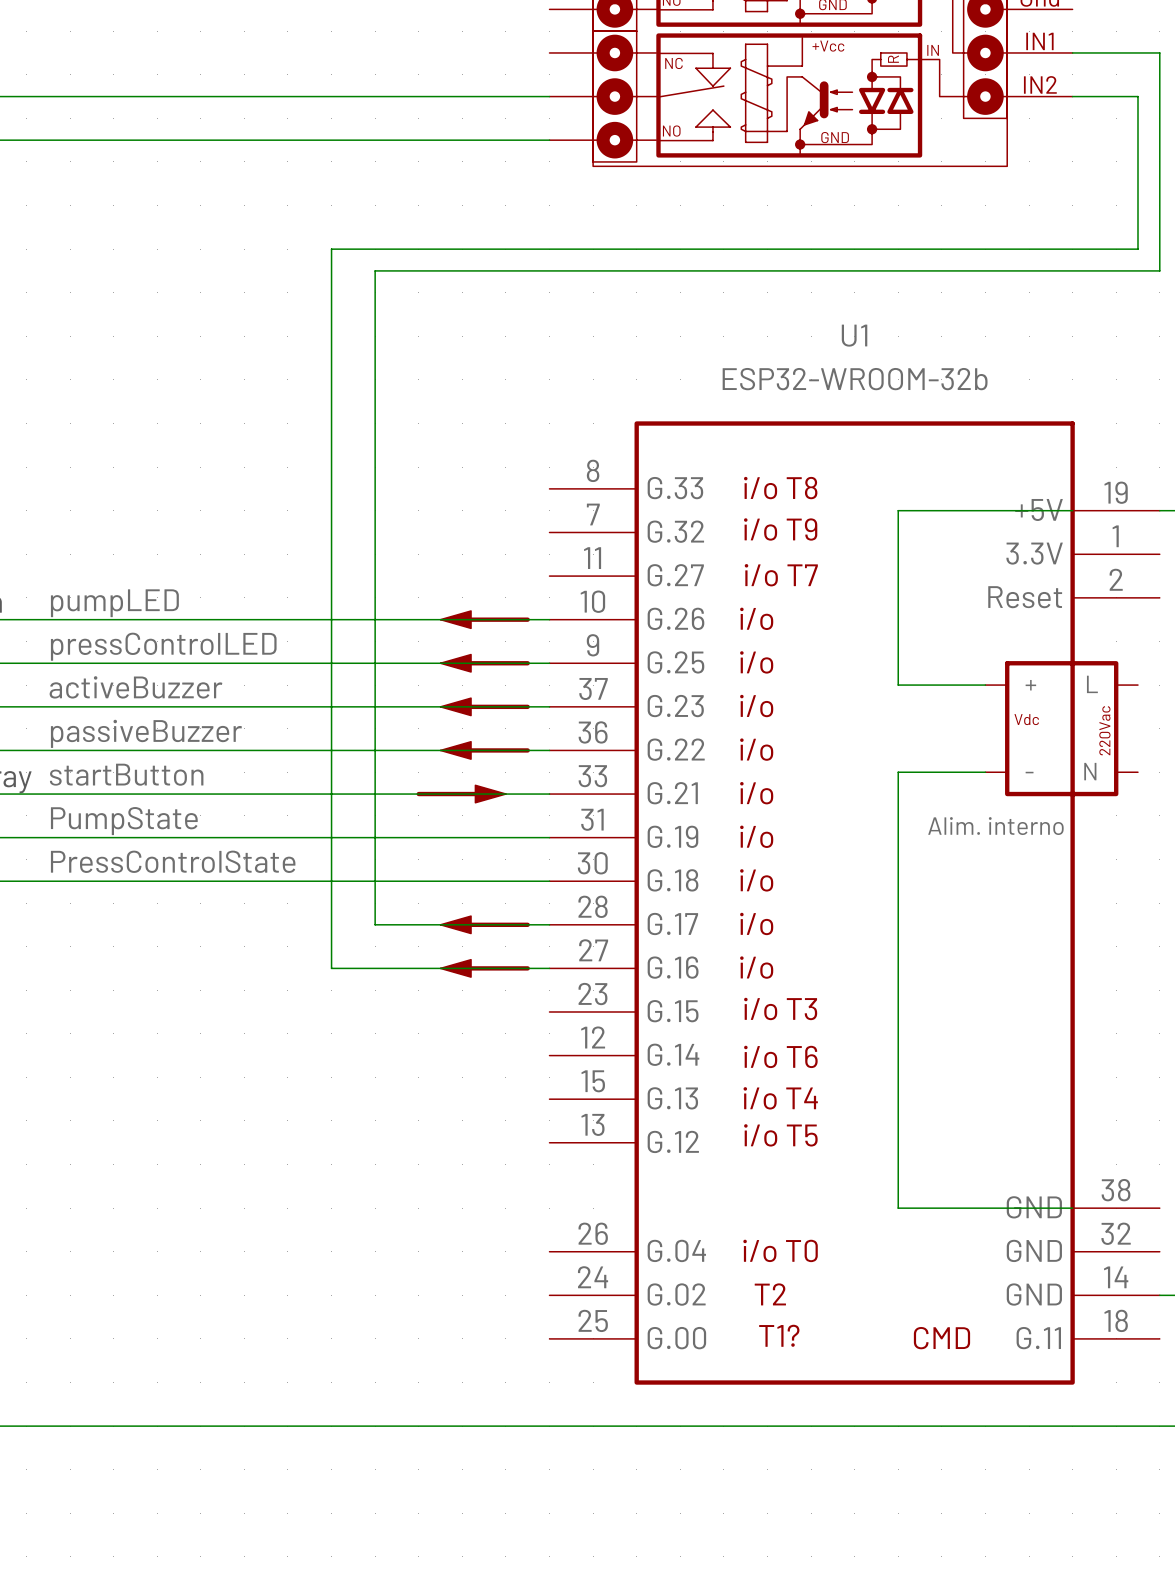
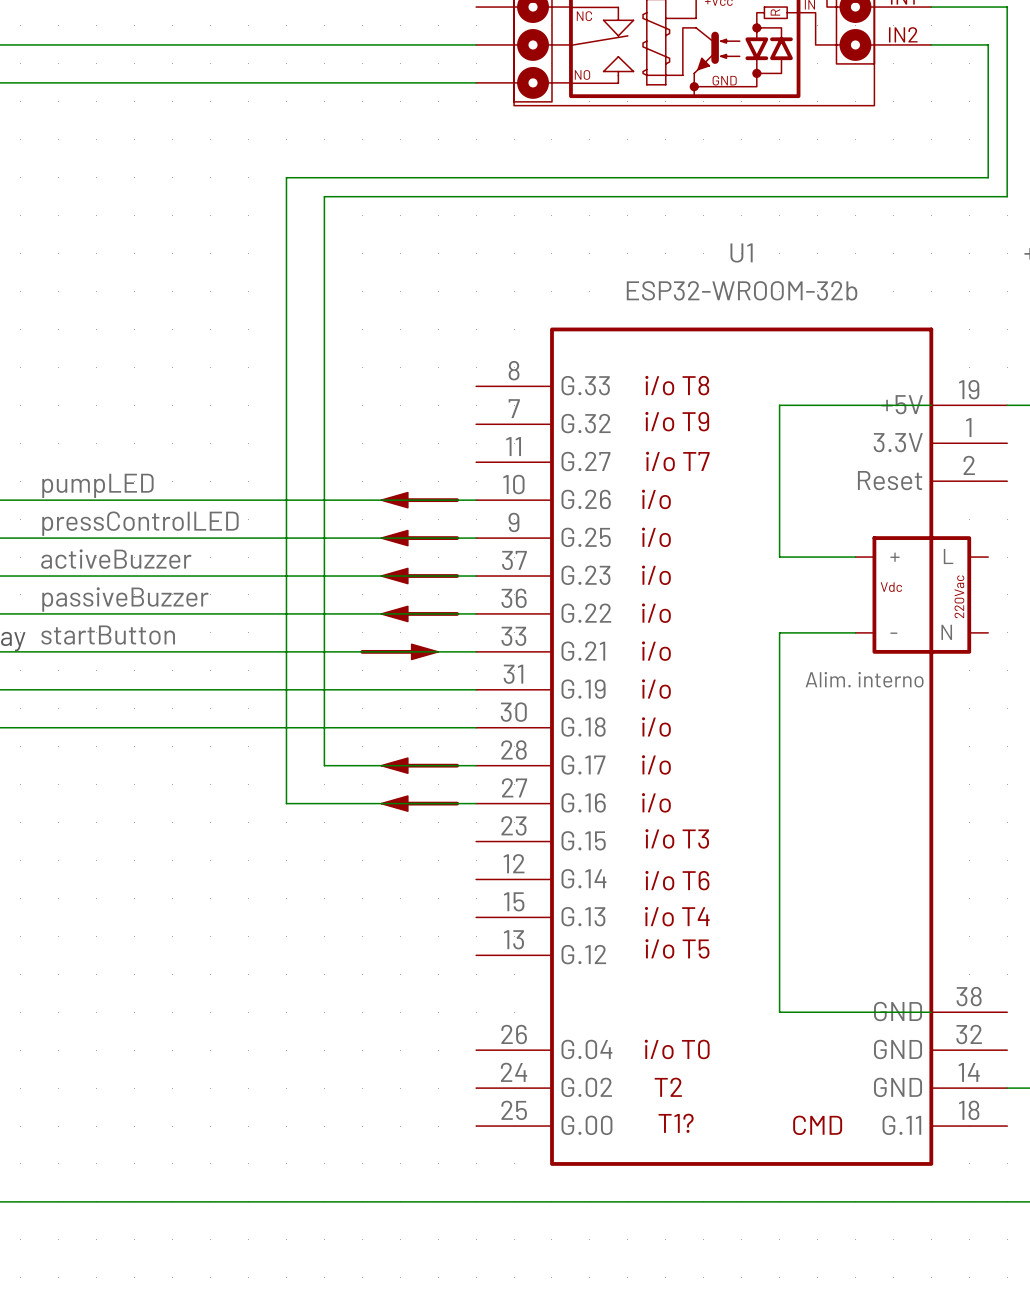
label: PumpState (124, 821) -> none
label: PressControlState (173, 861) -> none

